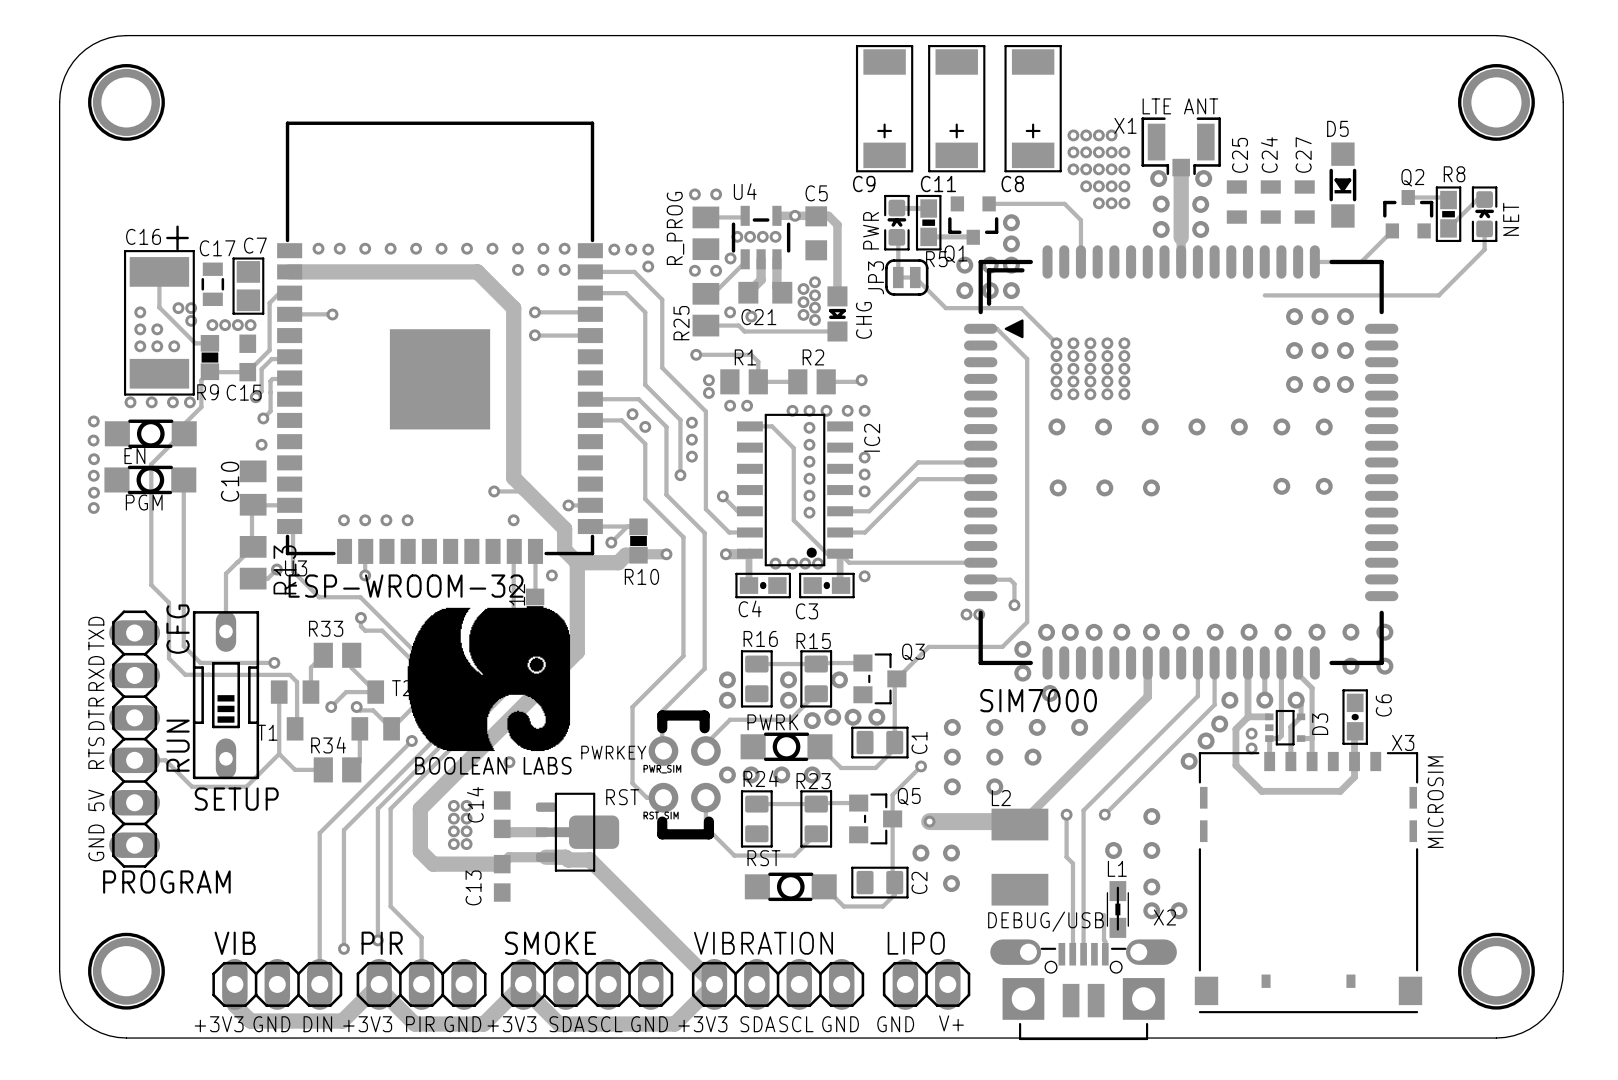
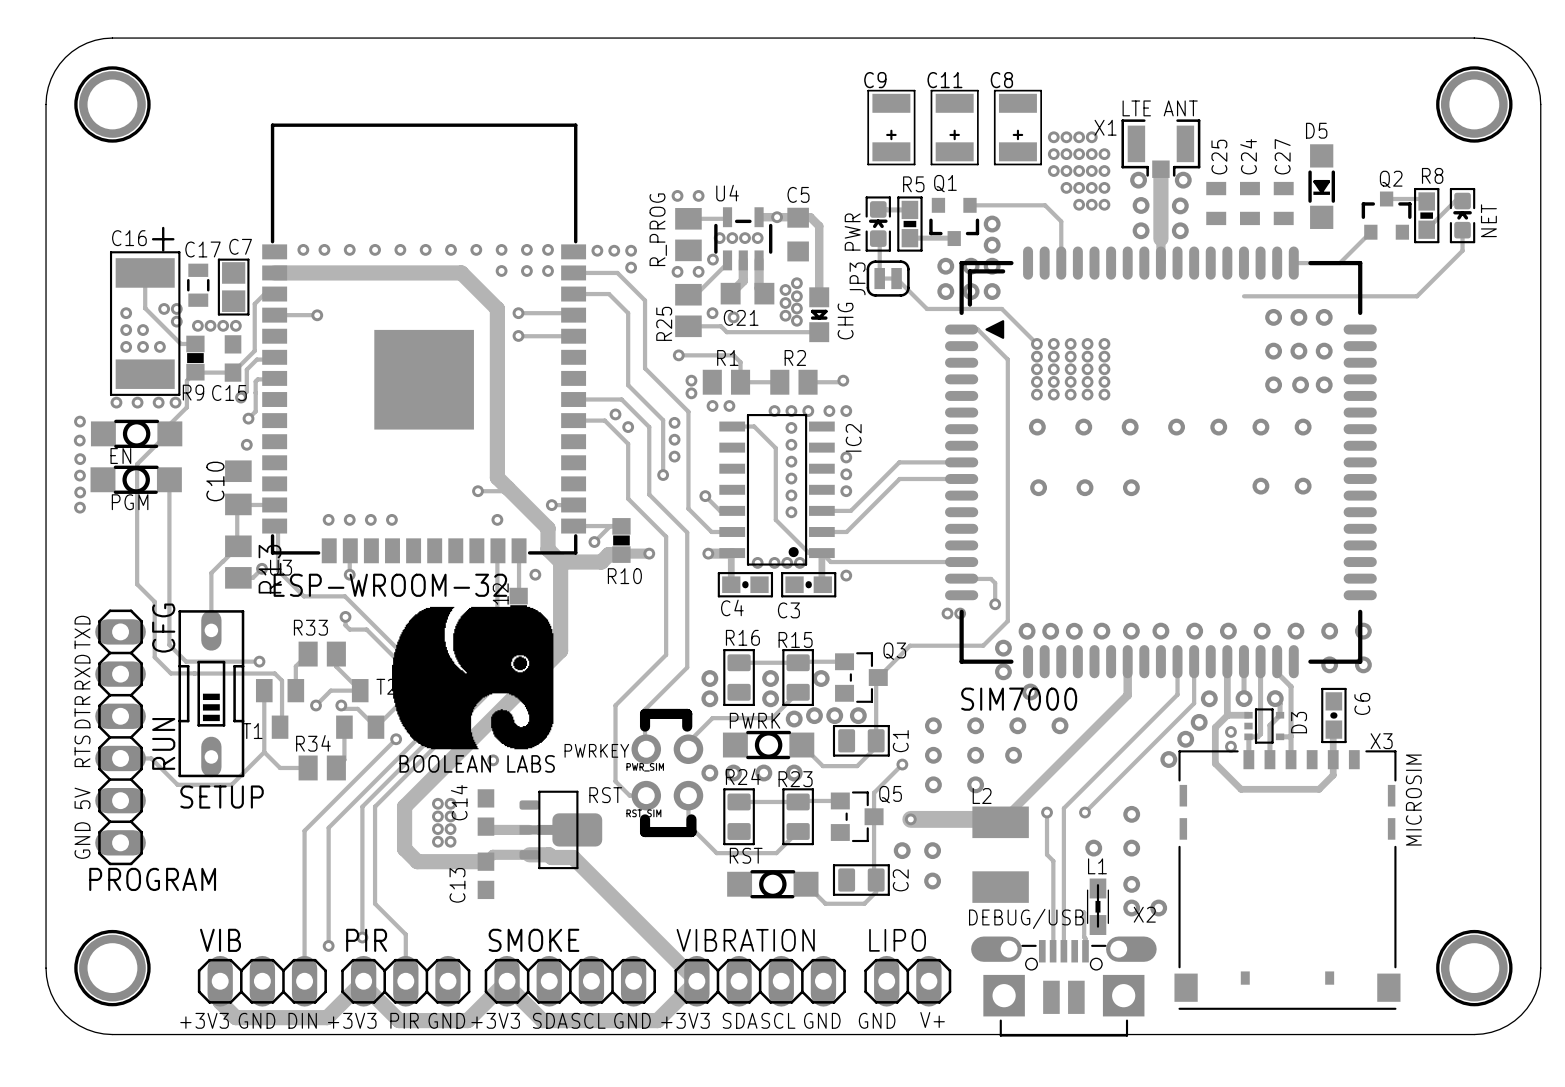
C9 footprint: [855, 45, 914, 173] -> [867, 89, 916, 166]
C11 footprint: [928, 45, 986, 173] -> [930, 89, 979, 166]
C8 footprint: [1004, 45, 1062, 173] -> [993, 89, 1042, 166]
C9 name position: C9 (864, 184) -> C9 (875, 80)
C11 name position: C11 (938, 184) -> C11 (944, 80)
C8 name position: C8 (1012, 184) -> C8 (1001, 80)
Q1 name position: Q1 (955, 254) -> Q1 (945, 183)
R5 name position: R5 (936, 259) -> R5 (913, 184)

